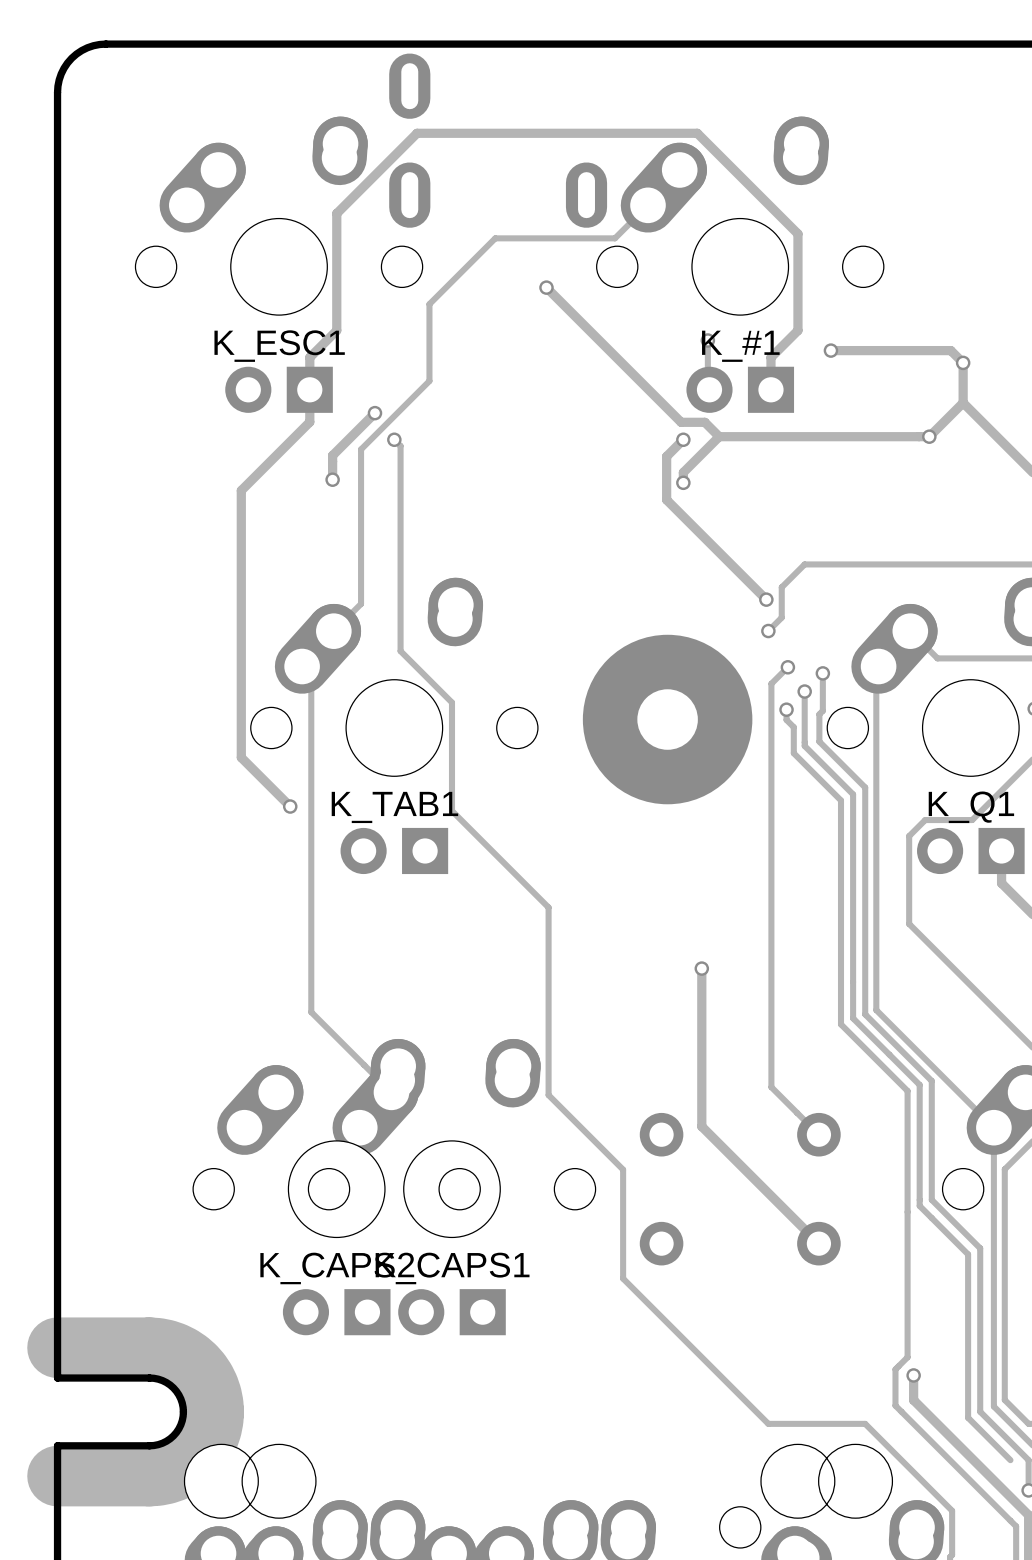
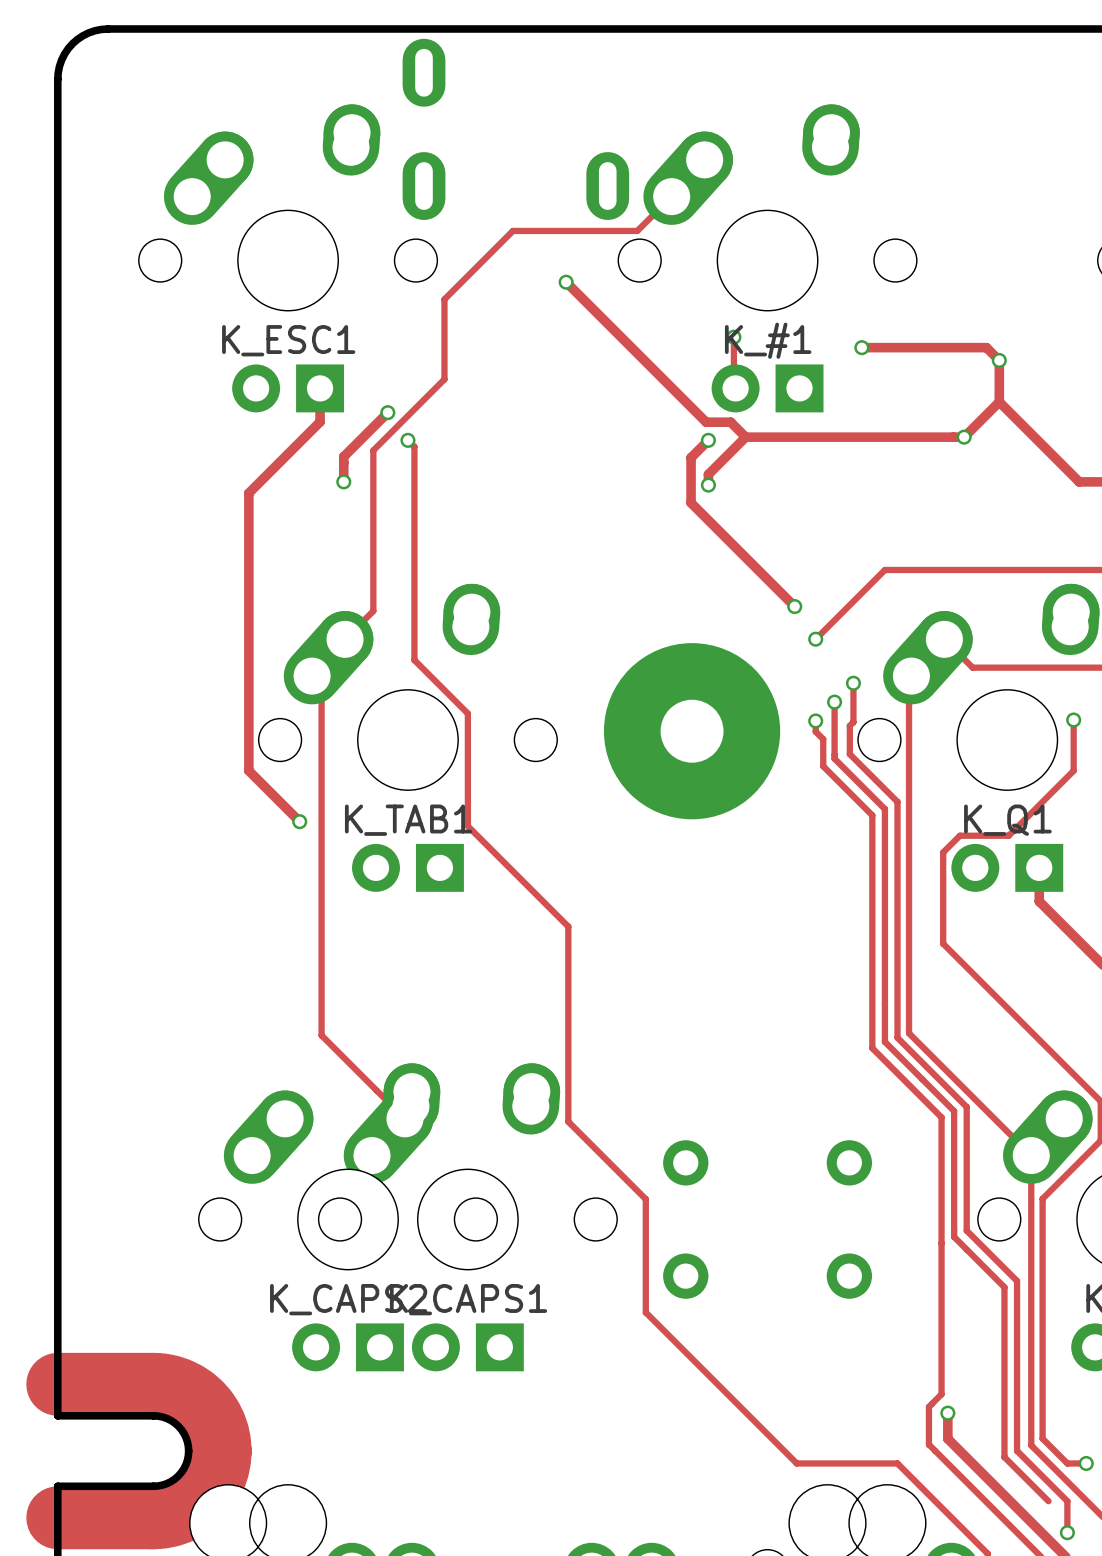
track: (309, 389) (309, 357) (336, 330) (336, 213) (417, 133) (697, 133) (797, 233) (797, 330) (770, 357) (770, 389) -> none
track: (853, 564) (804, 564) (781, 587) (781, 617) (768, 631) -> (884, 569) (815, 639)
via: (768, 631) -> none
via: none -> (815, 639)
track: (787, 667) (771, 683) (771, 1087) (818, 1134) -> none
via: (787, 667) -> none
track: (701, 968) (701, 1126) (818, 1243) -> none
via: (701, 968) -> none

